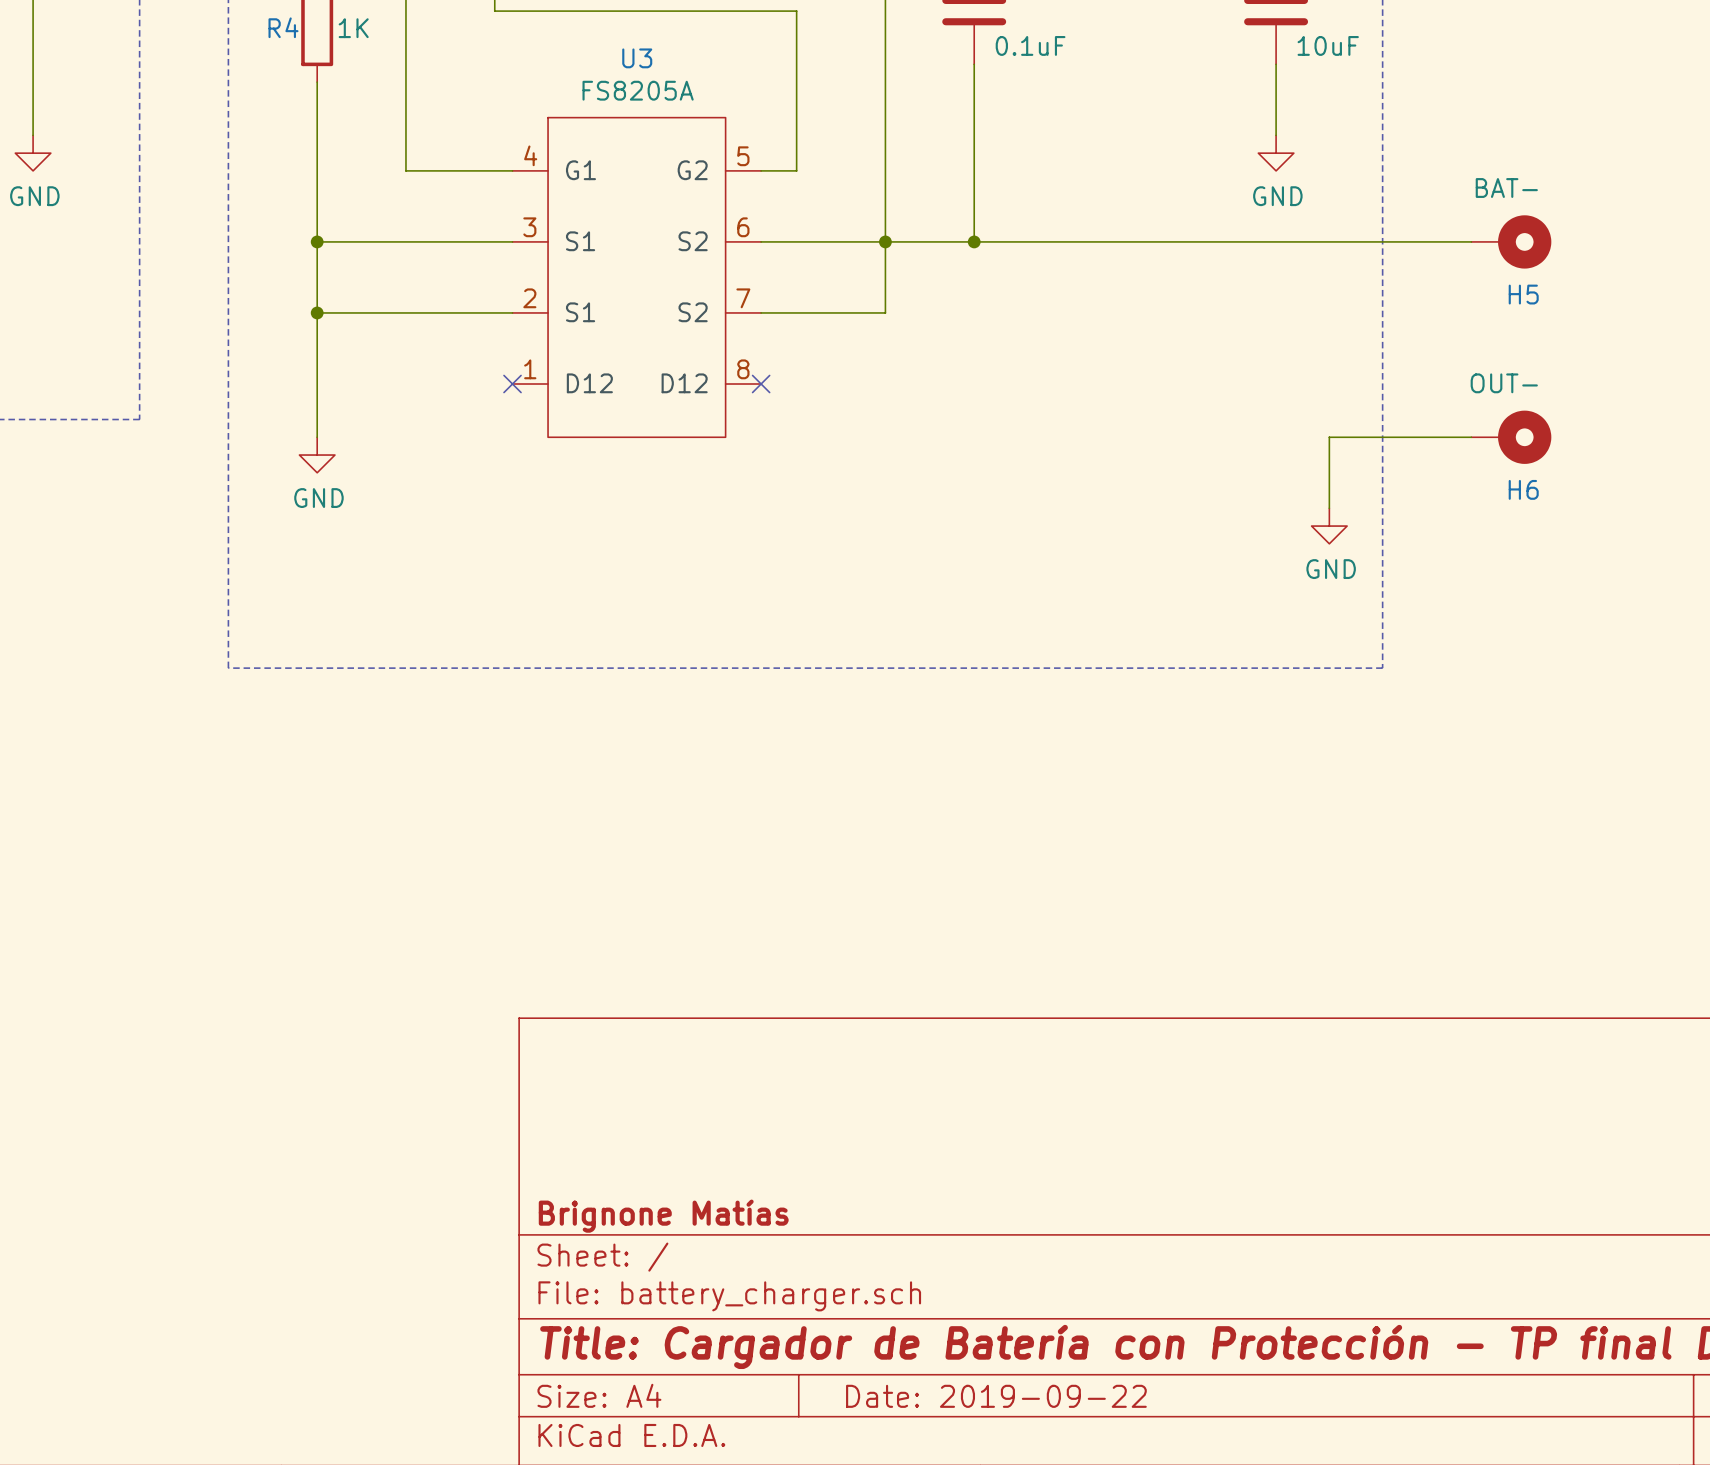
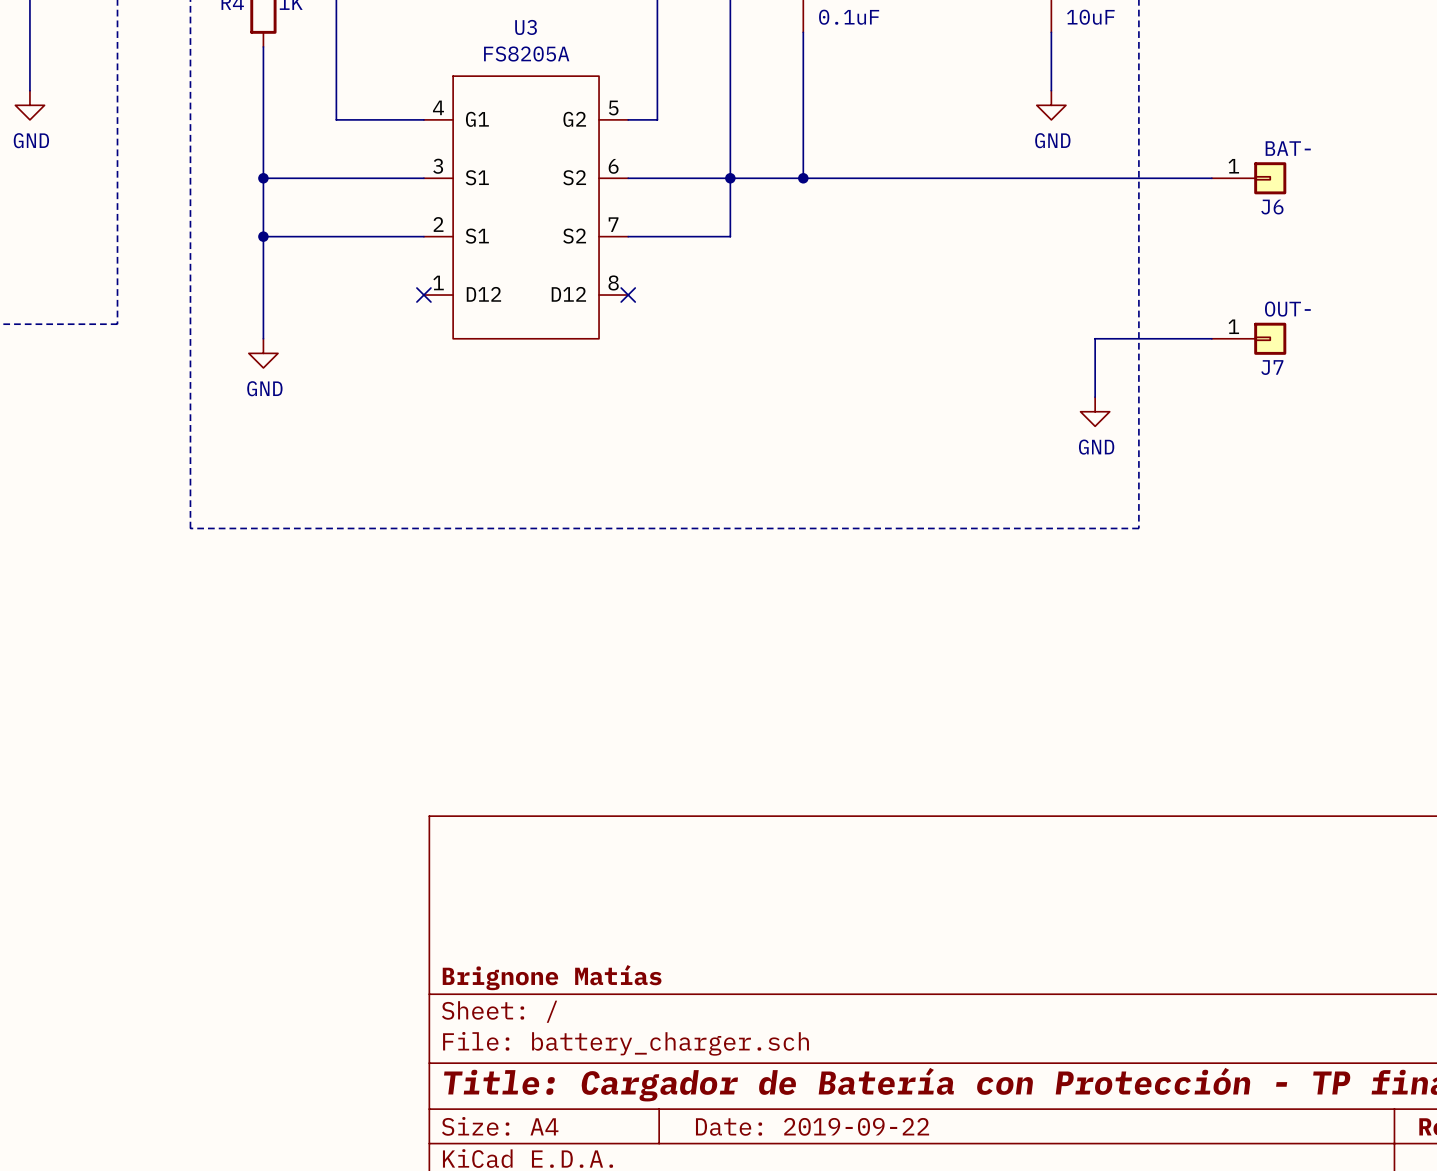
H5: BAT- (1511, 241) -> none
J6: none -> BAT- (1249, 178)
H6: OUT- (1511, 437) -> none
J7: none -> OUT- (1249, 338)

